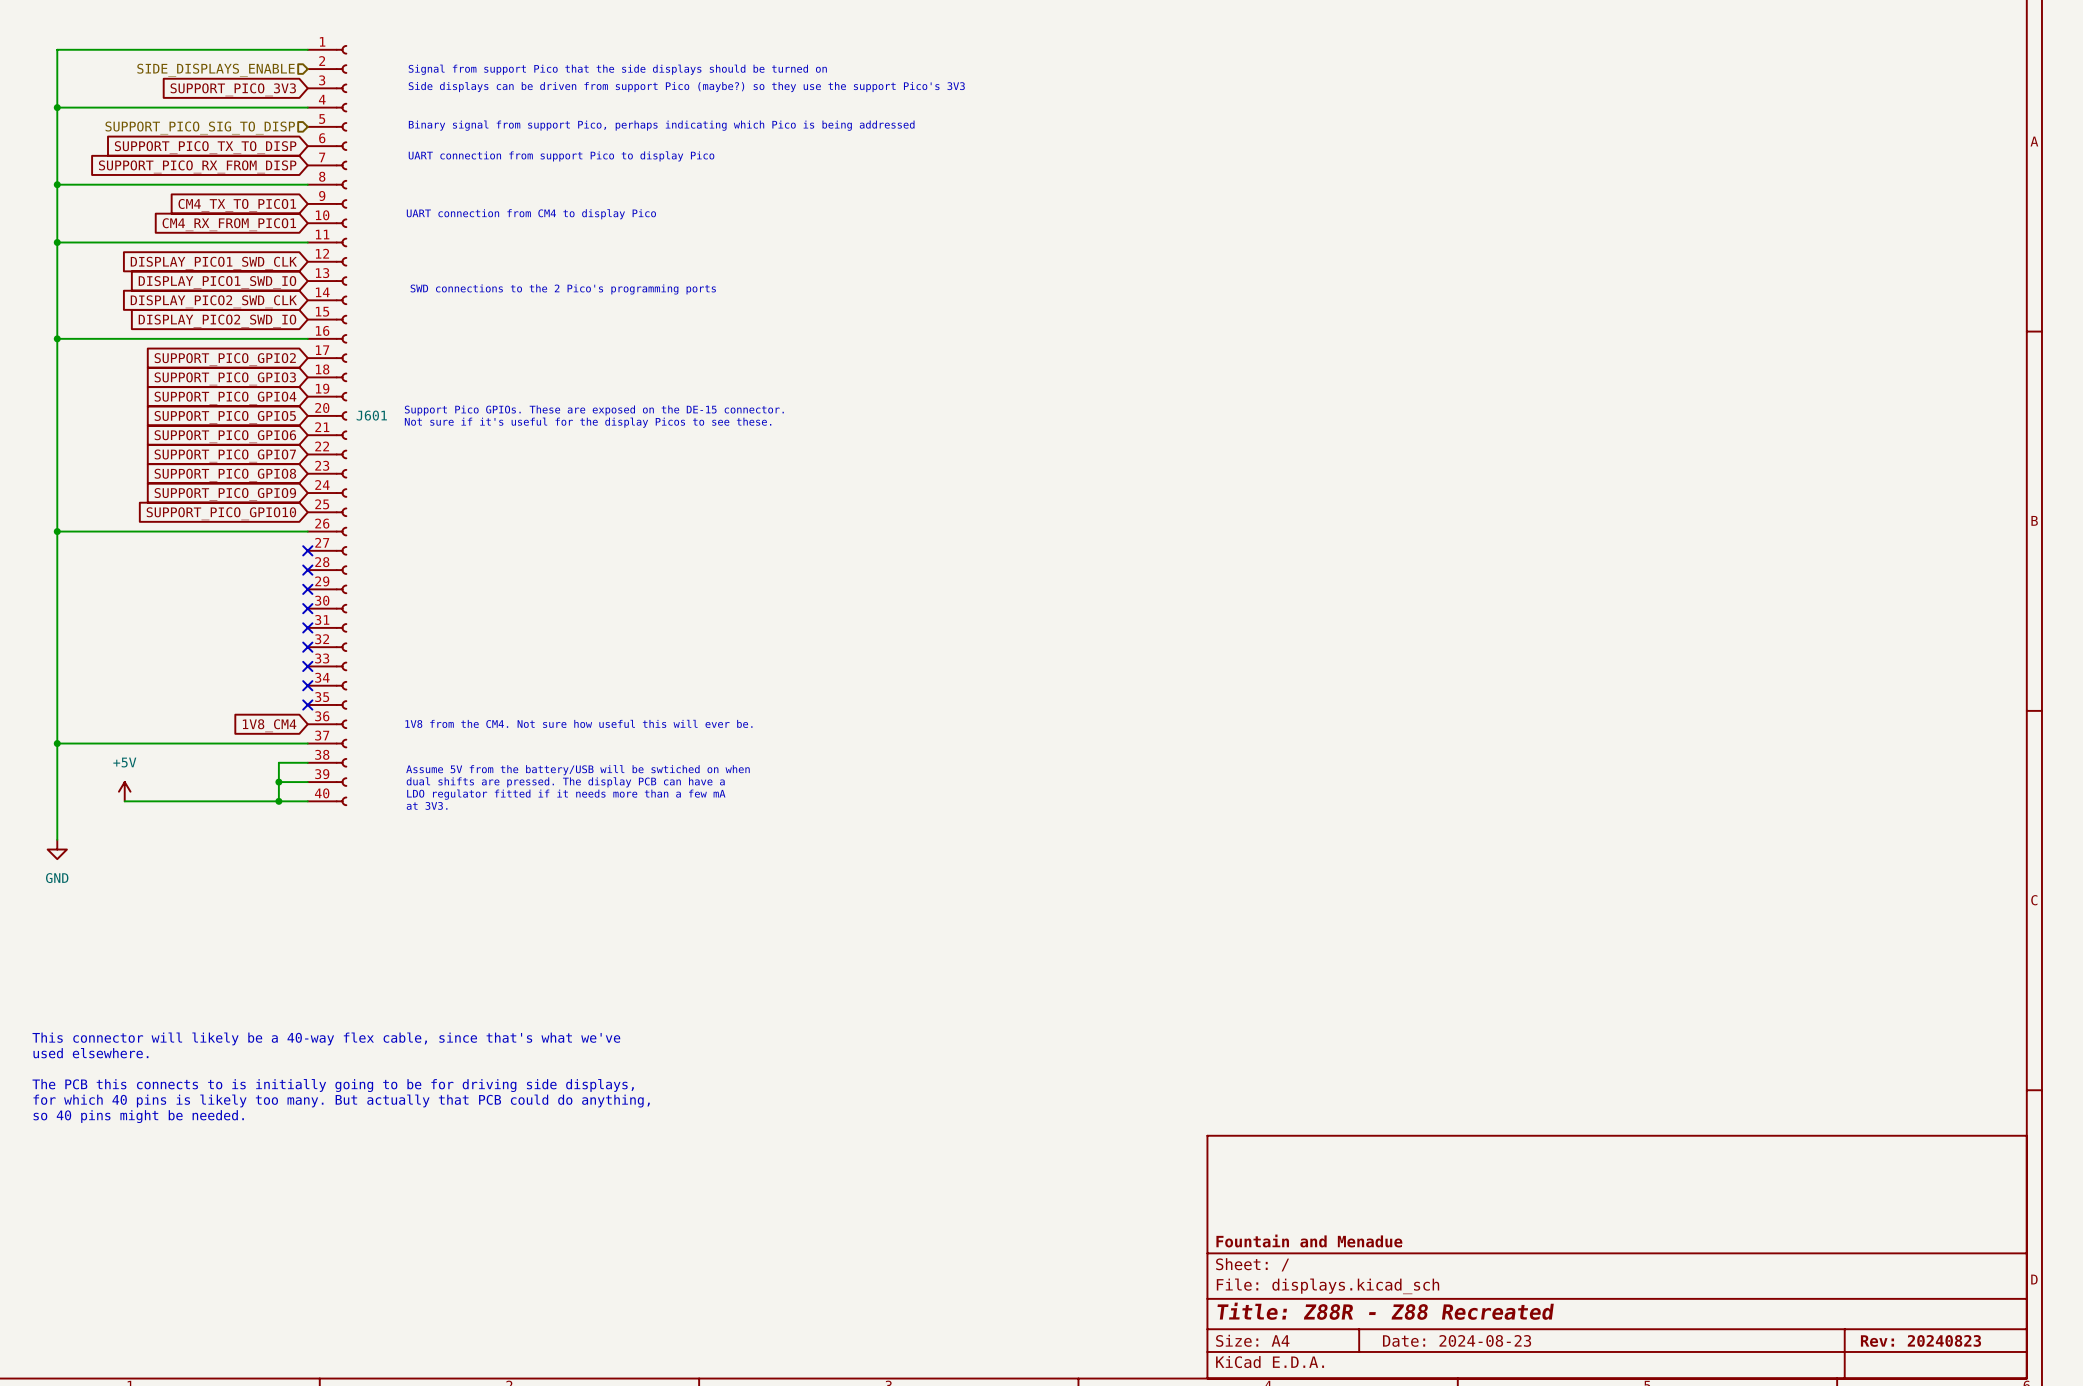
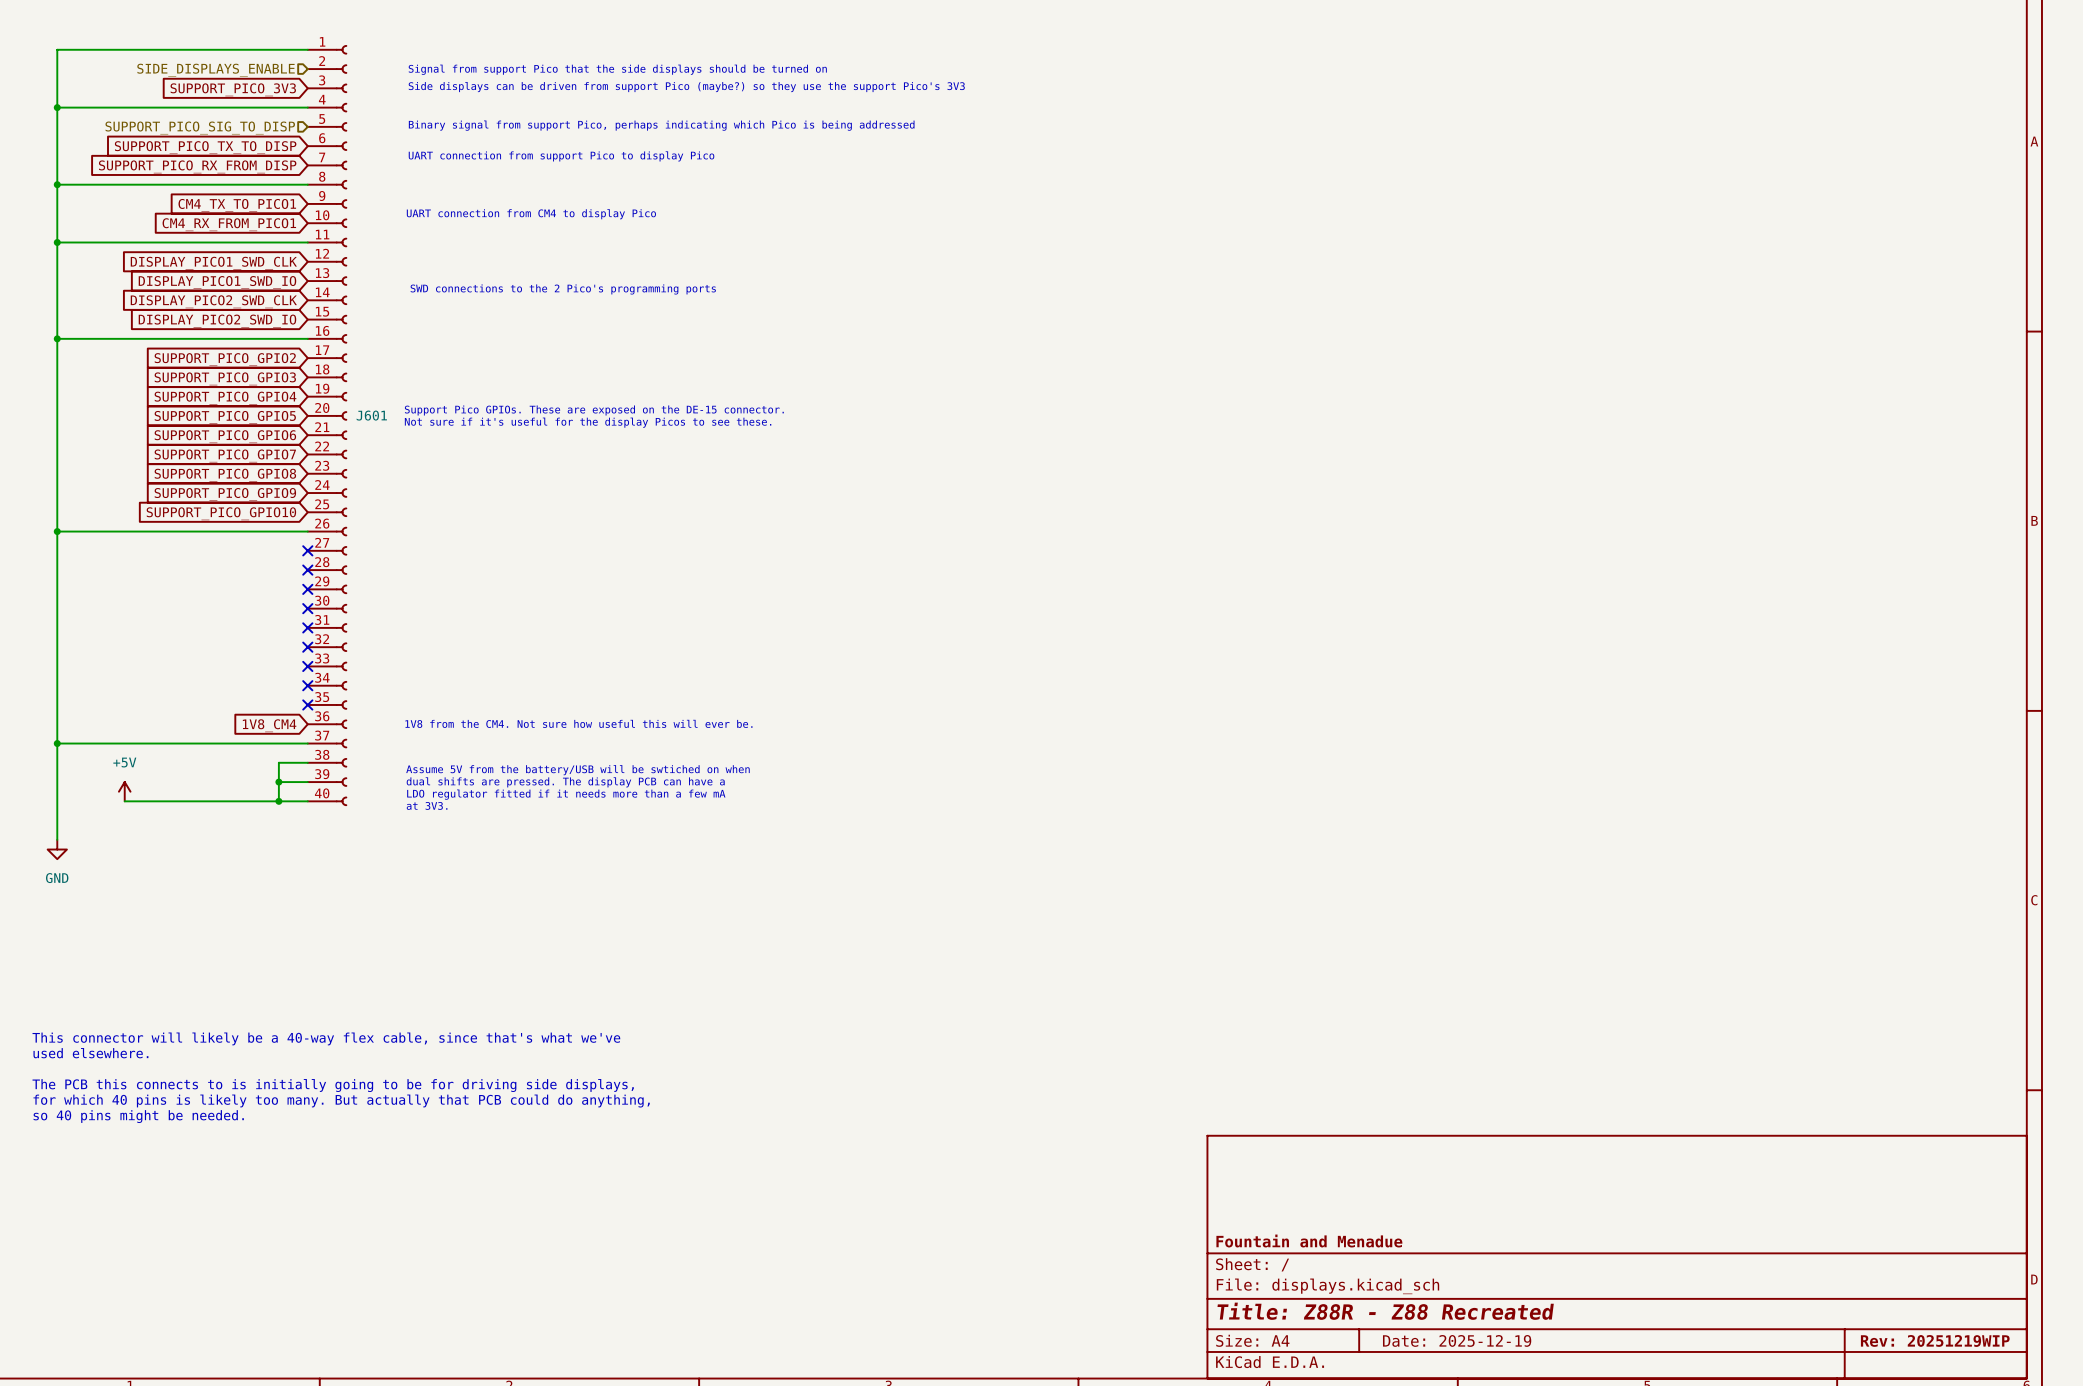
title block: Date: 2024-08-23 (1457, 1340) -> Date: 2025-12-19 (1457, 1340)
title block: Rev: 20240823 (1920, 1340) -> Rev: 20251219WIP (1935, 1340)

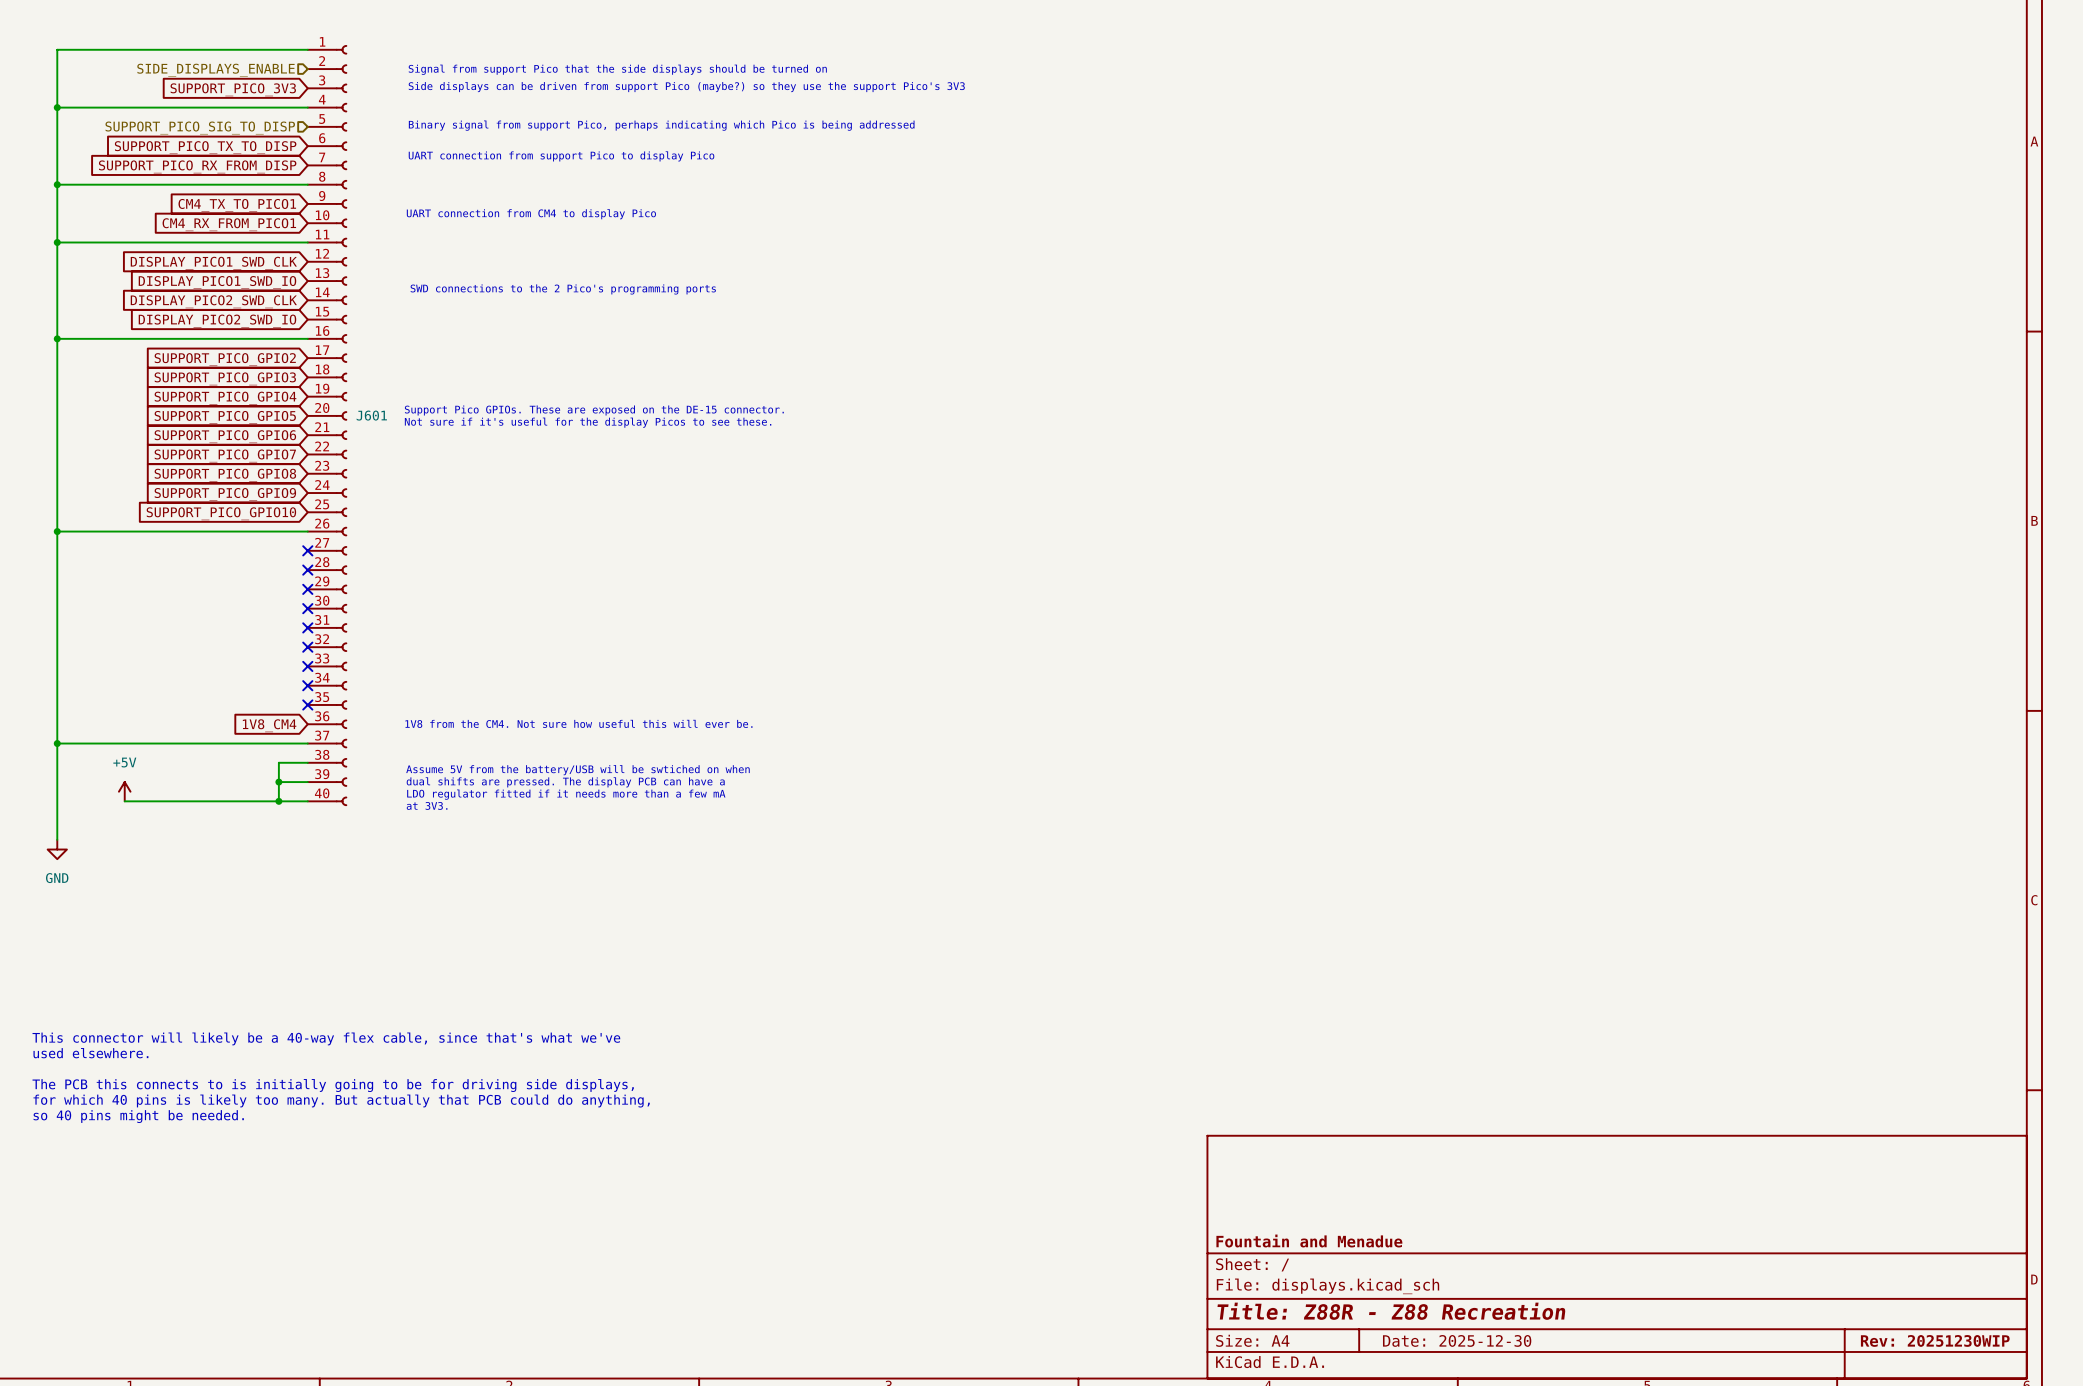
title block: Title: Z88R - Z88 Recreated (1385, 1311) -> Title: Z88R - Z88 Recreation (1391, 1311)
title block: Date: 2025-12-19 (1457, 1340) -> Date: 2025-12-30 (1457, 1340)
title block: Rev: 20251219WIP (1935, 1340) -> Rev: 20251230WIP (1935, 1340)

